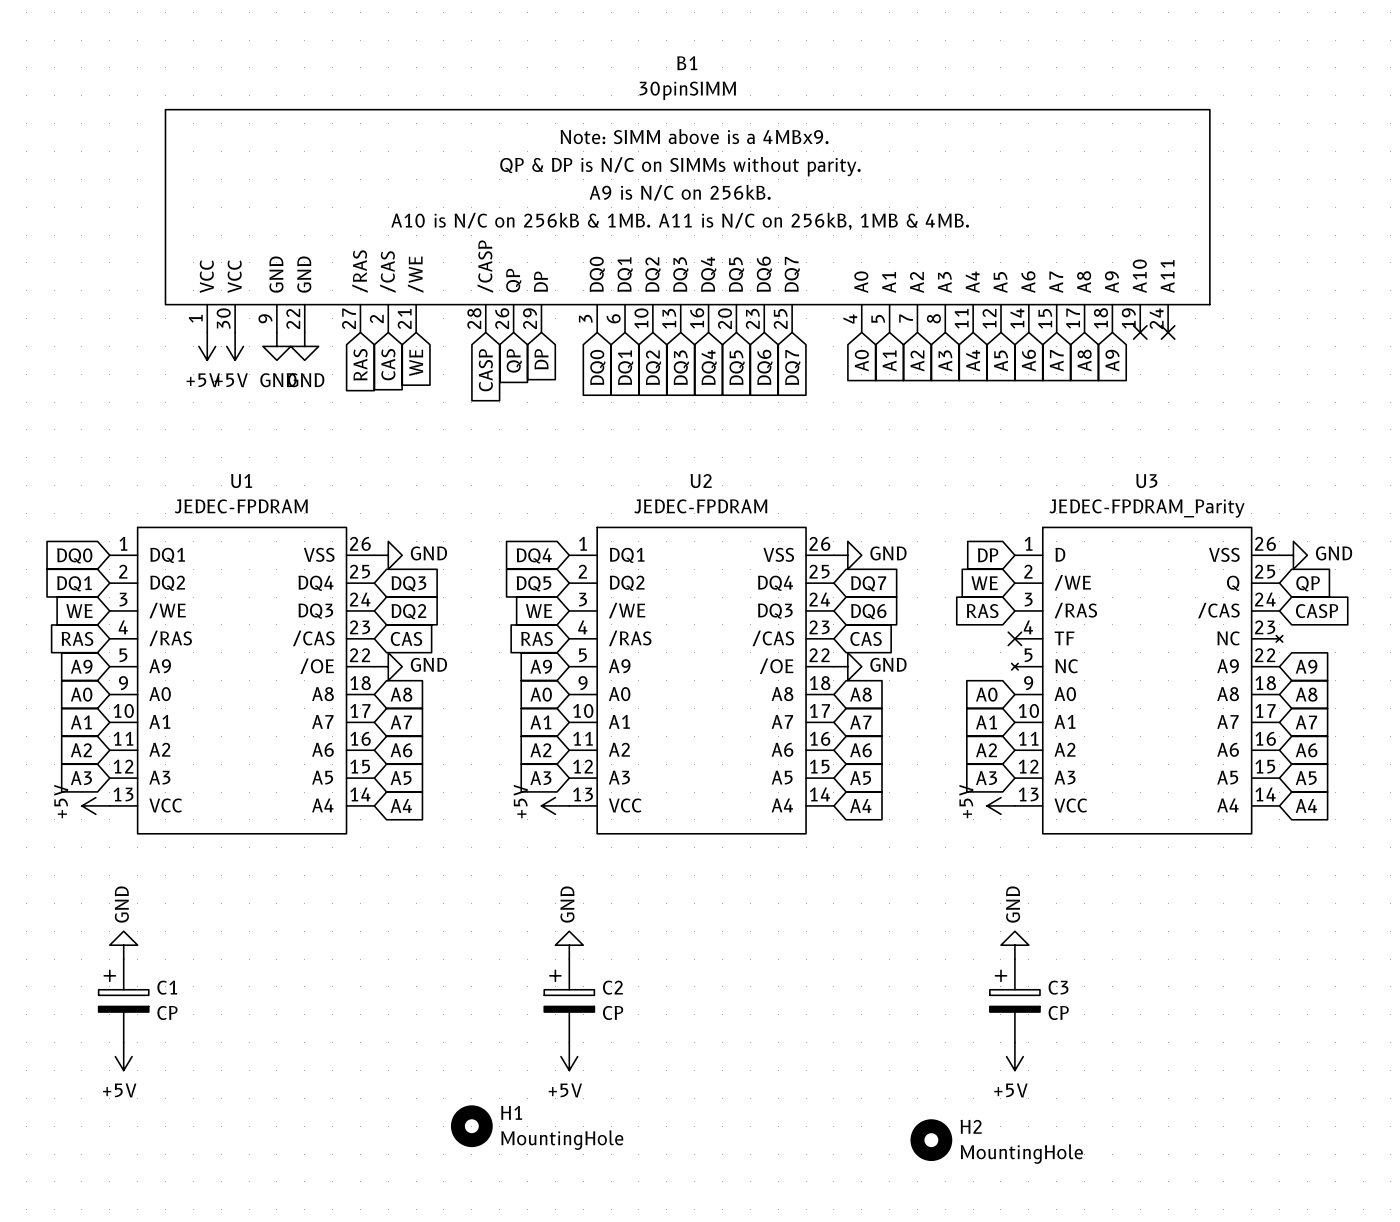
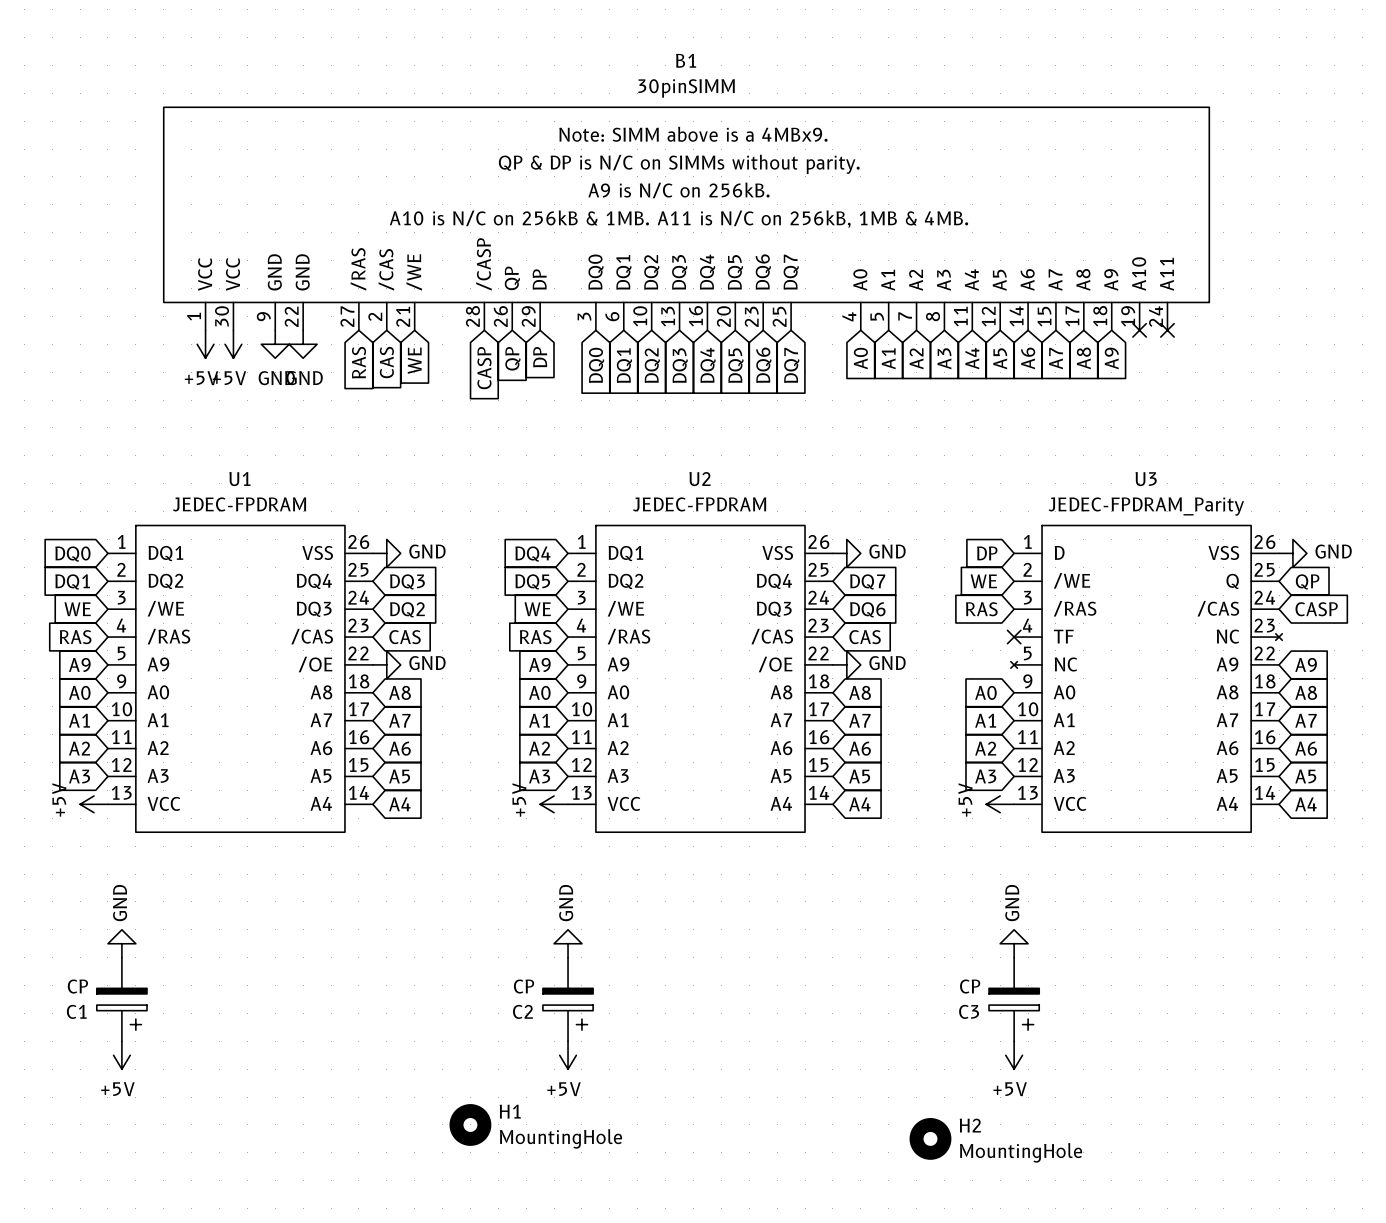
C1 rotation: 0° (123, 991) -> 180° (121, 1009)
C2 rotation: 0° (569, 991) -> 180° (568, 1009)
C3 rotation: 0° (1014, 991) -> 180° (1014, 1009)

